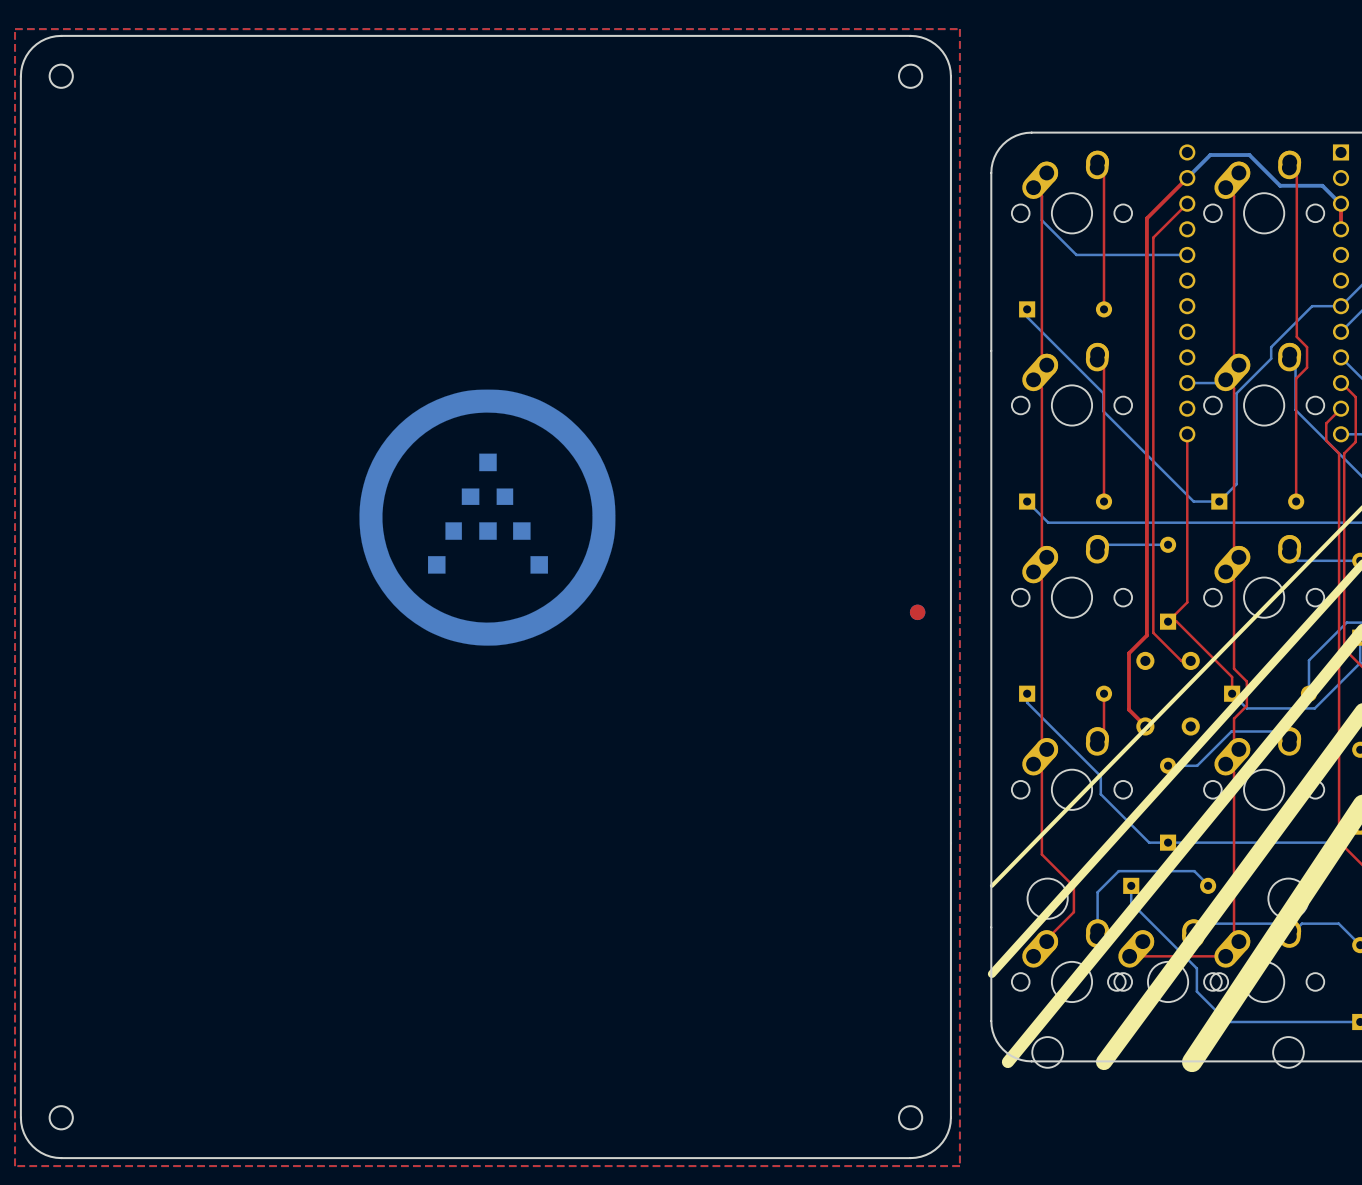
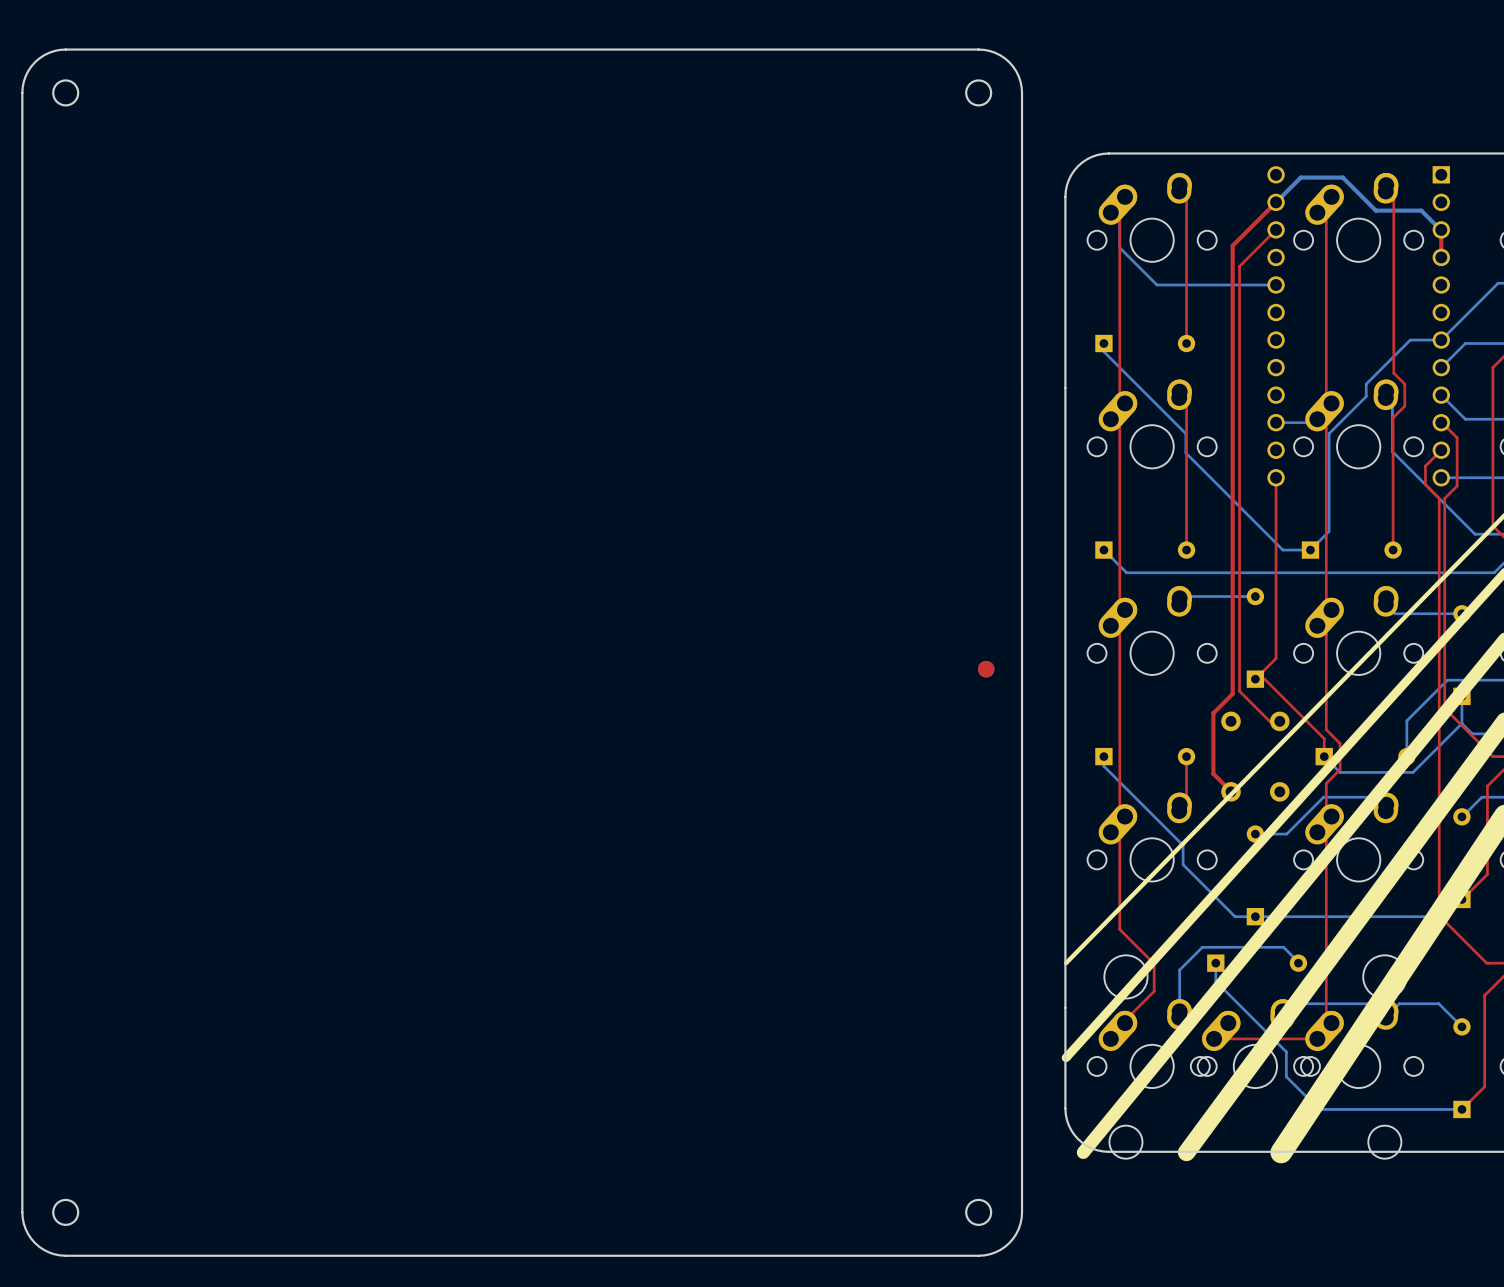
top zone outline: (15, 29) (959, 29) (959, 1166) (15, 1166) (15, 29) -> none
drawing: [359, 389, 616, 646] -> none

